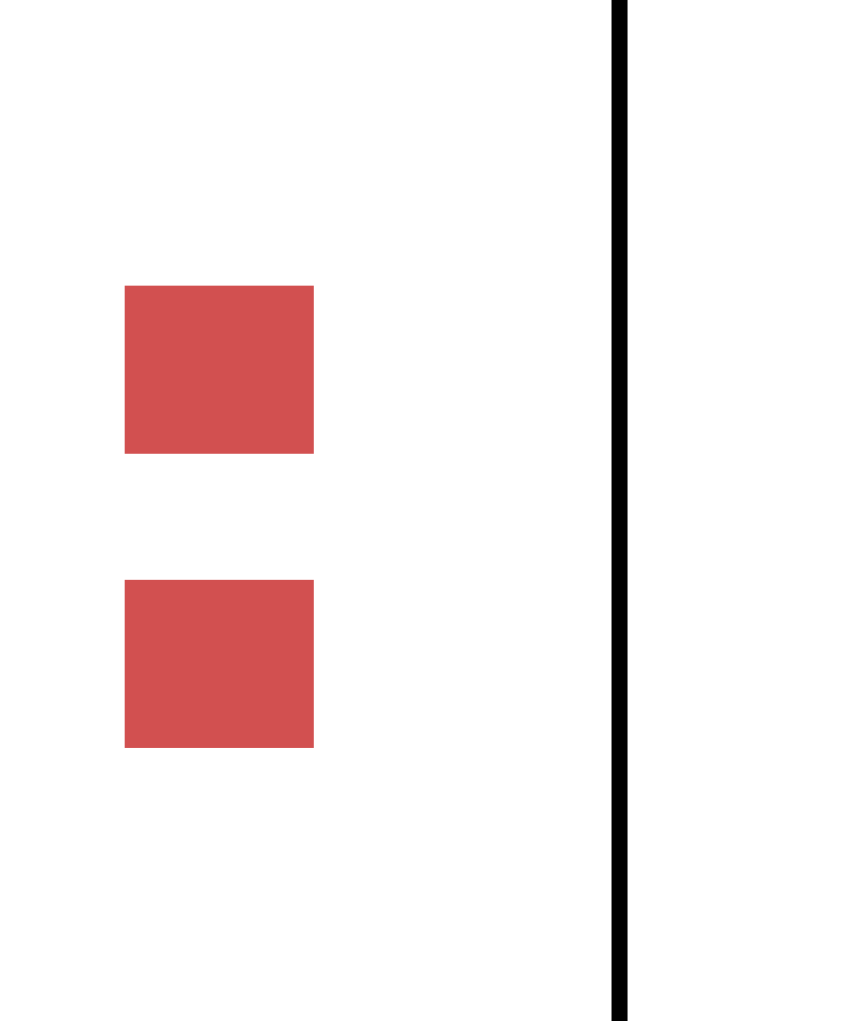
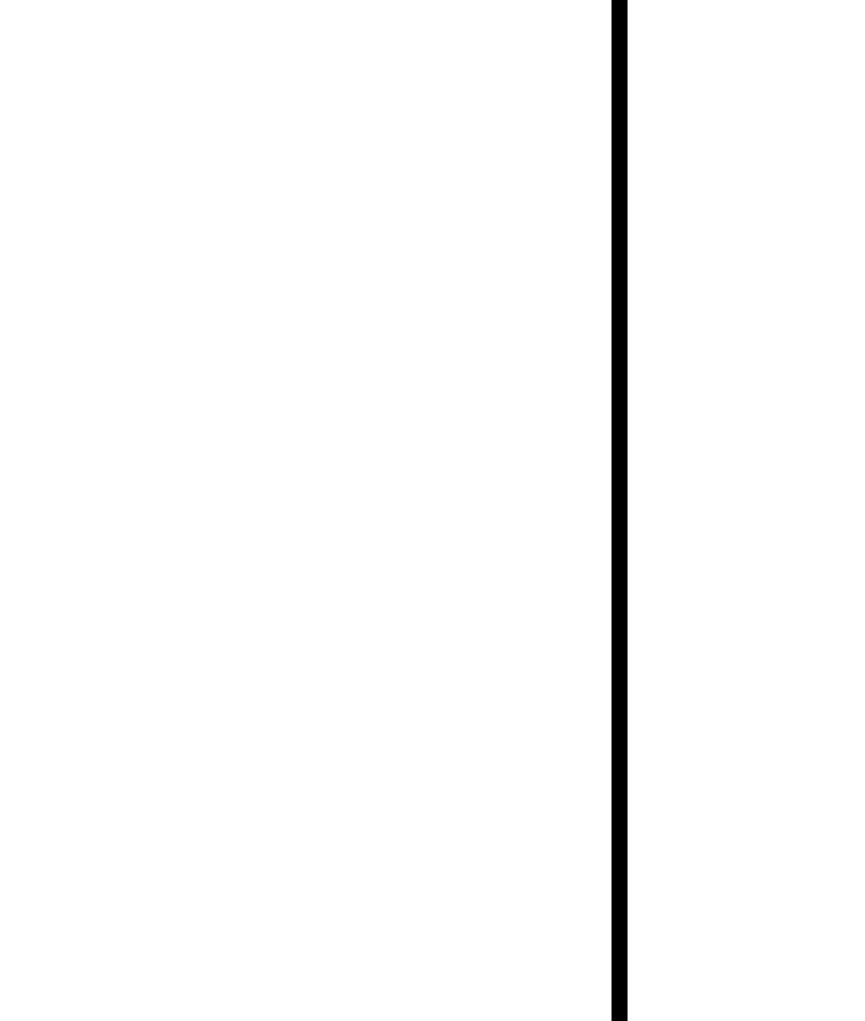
part: (219, 516) -> none

